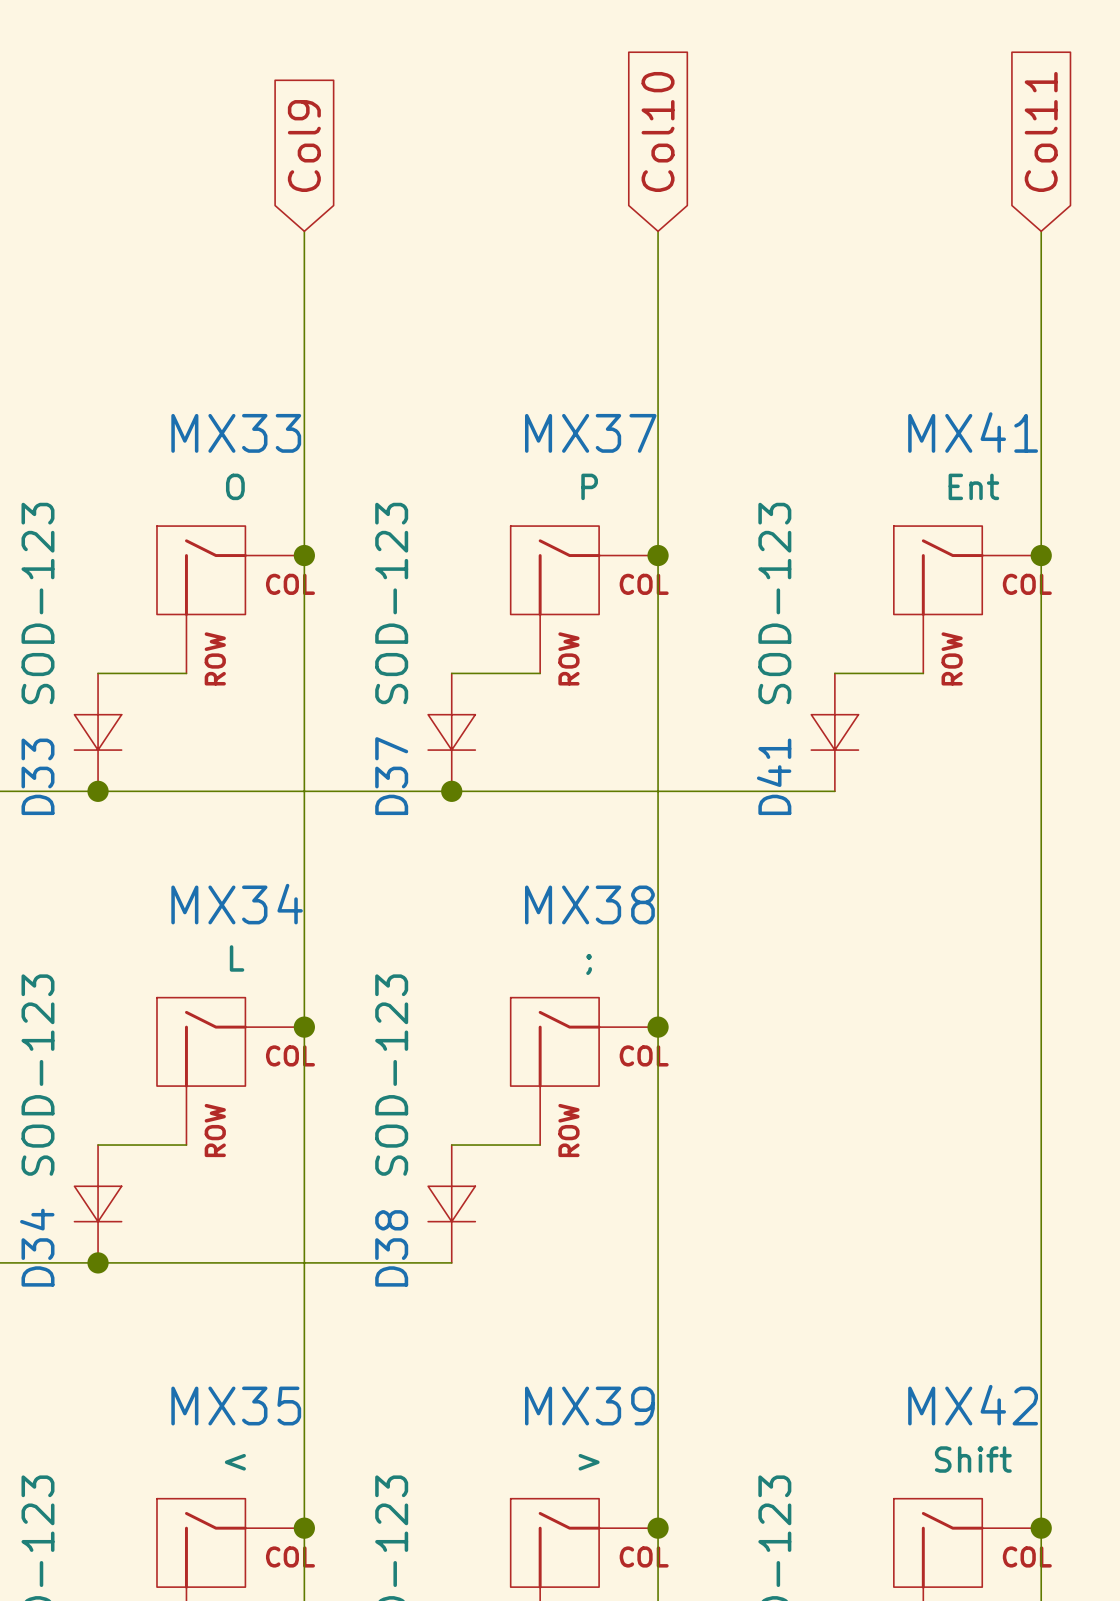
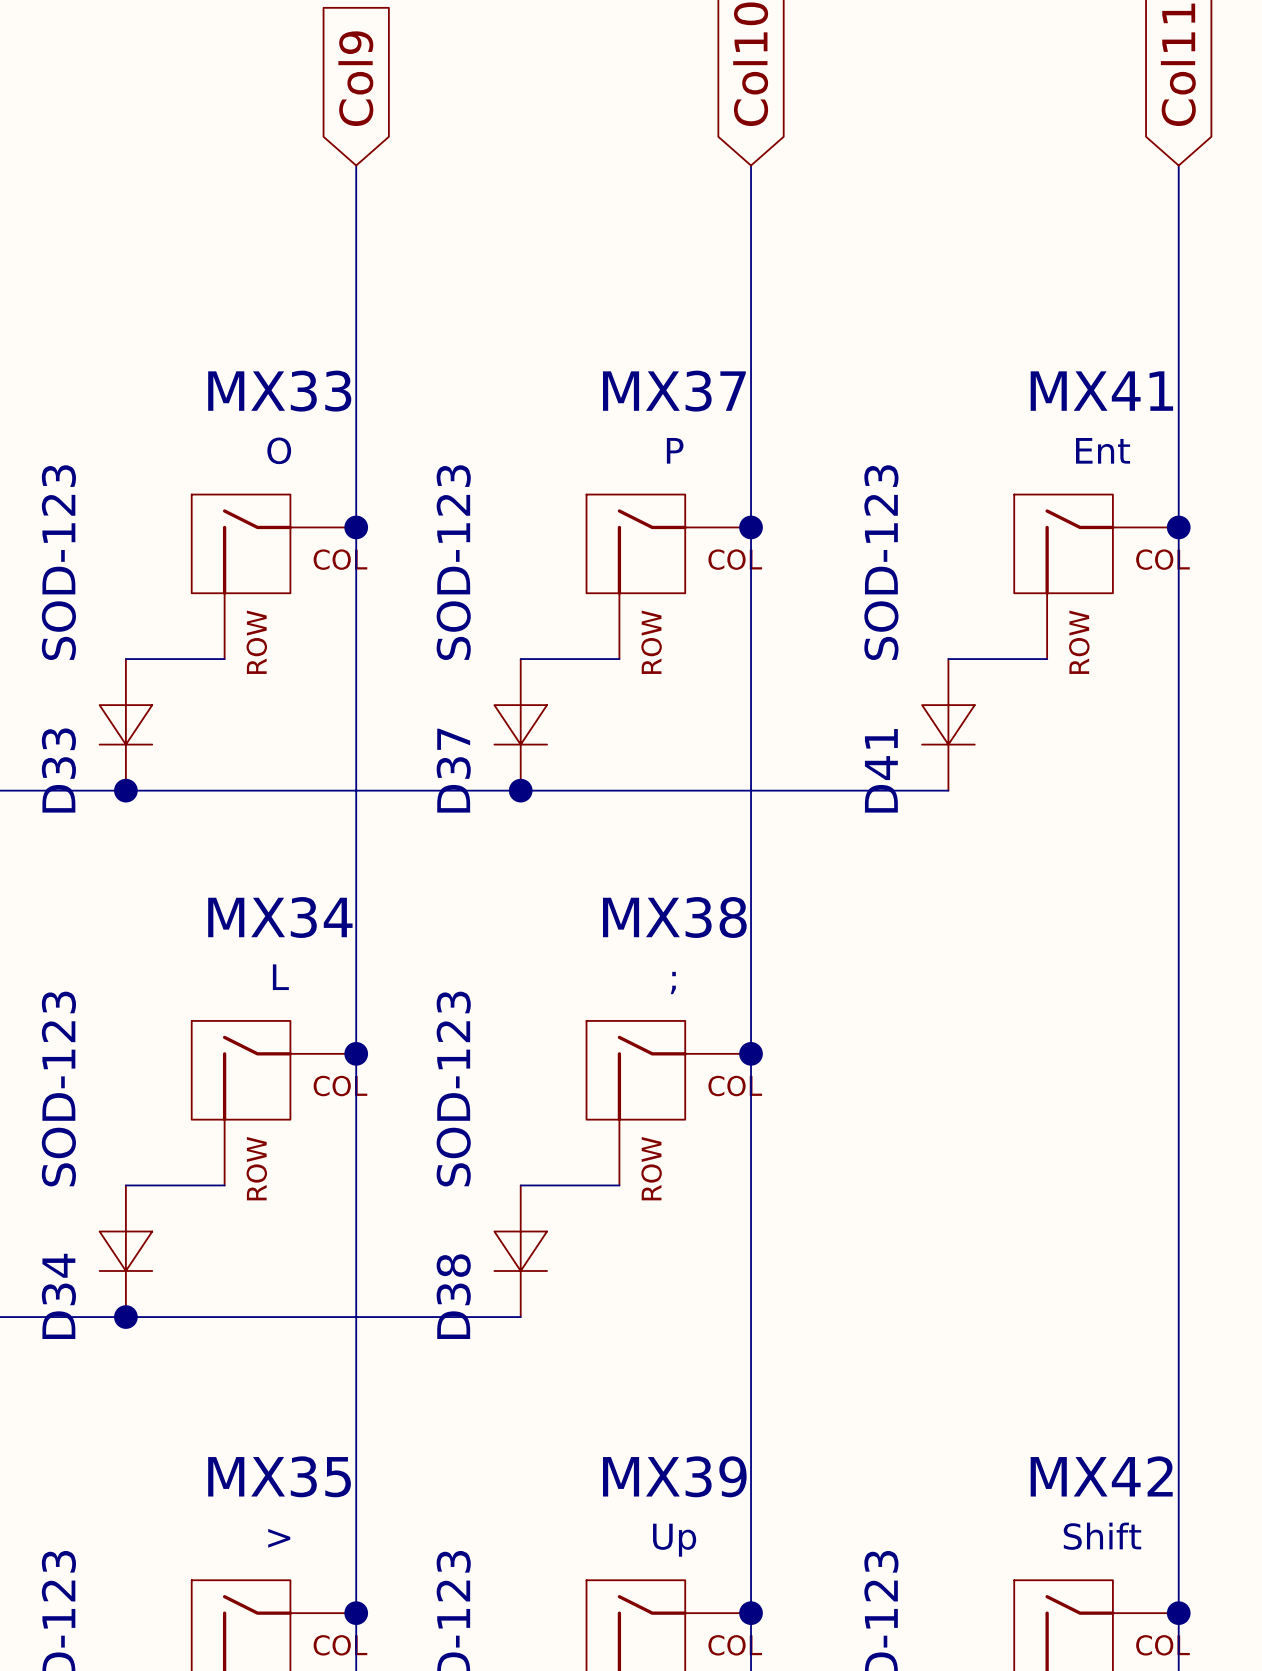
MX35 value: < (235, 1462) -> > (279, 1538)
MX39 value: > (589, 1462) -> Up (674, 1540)

